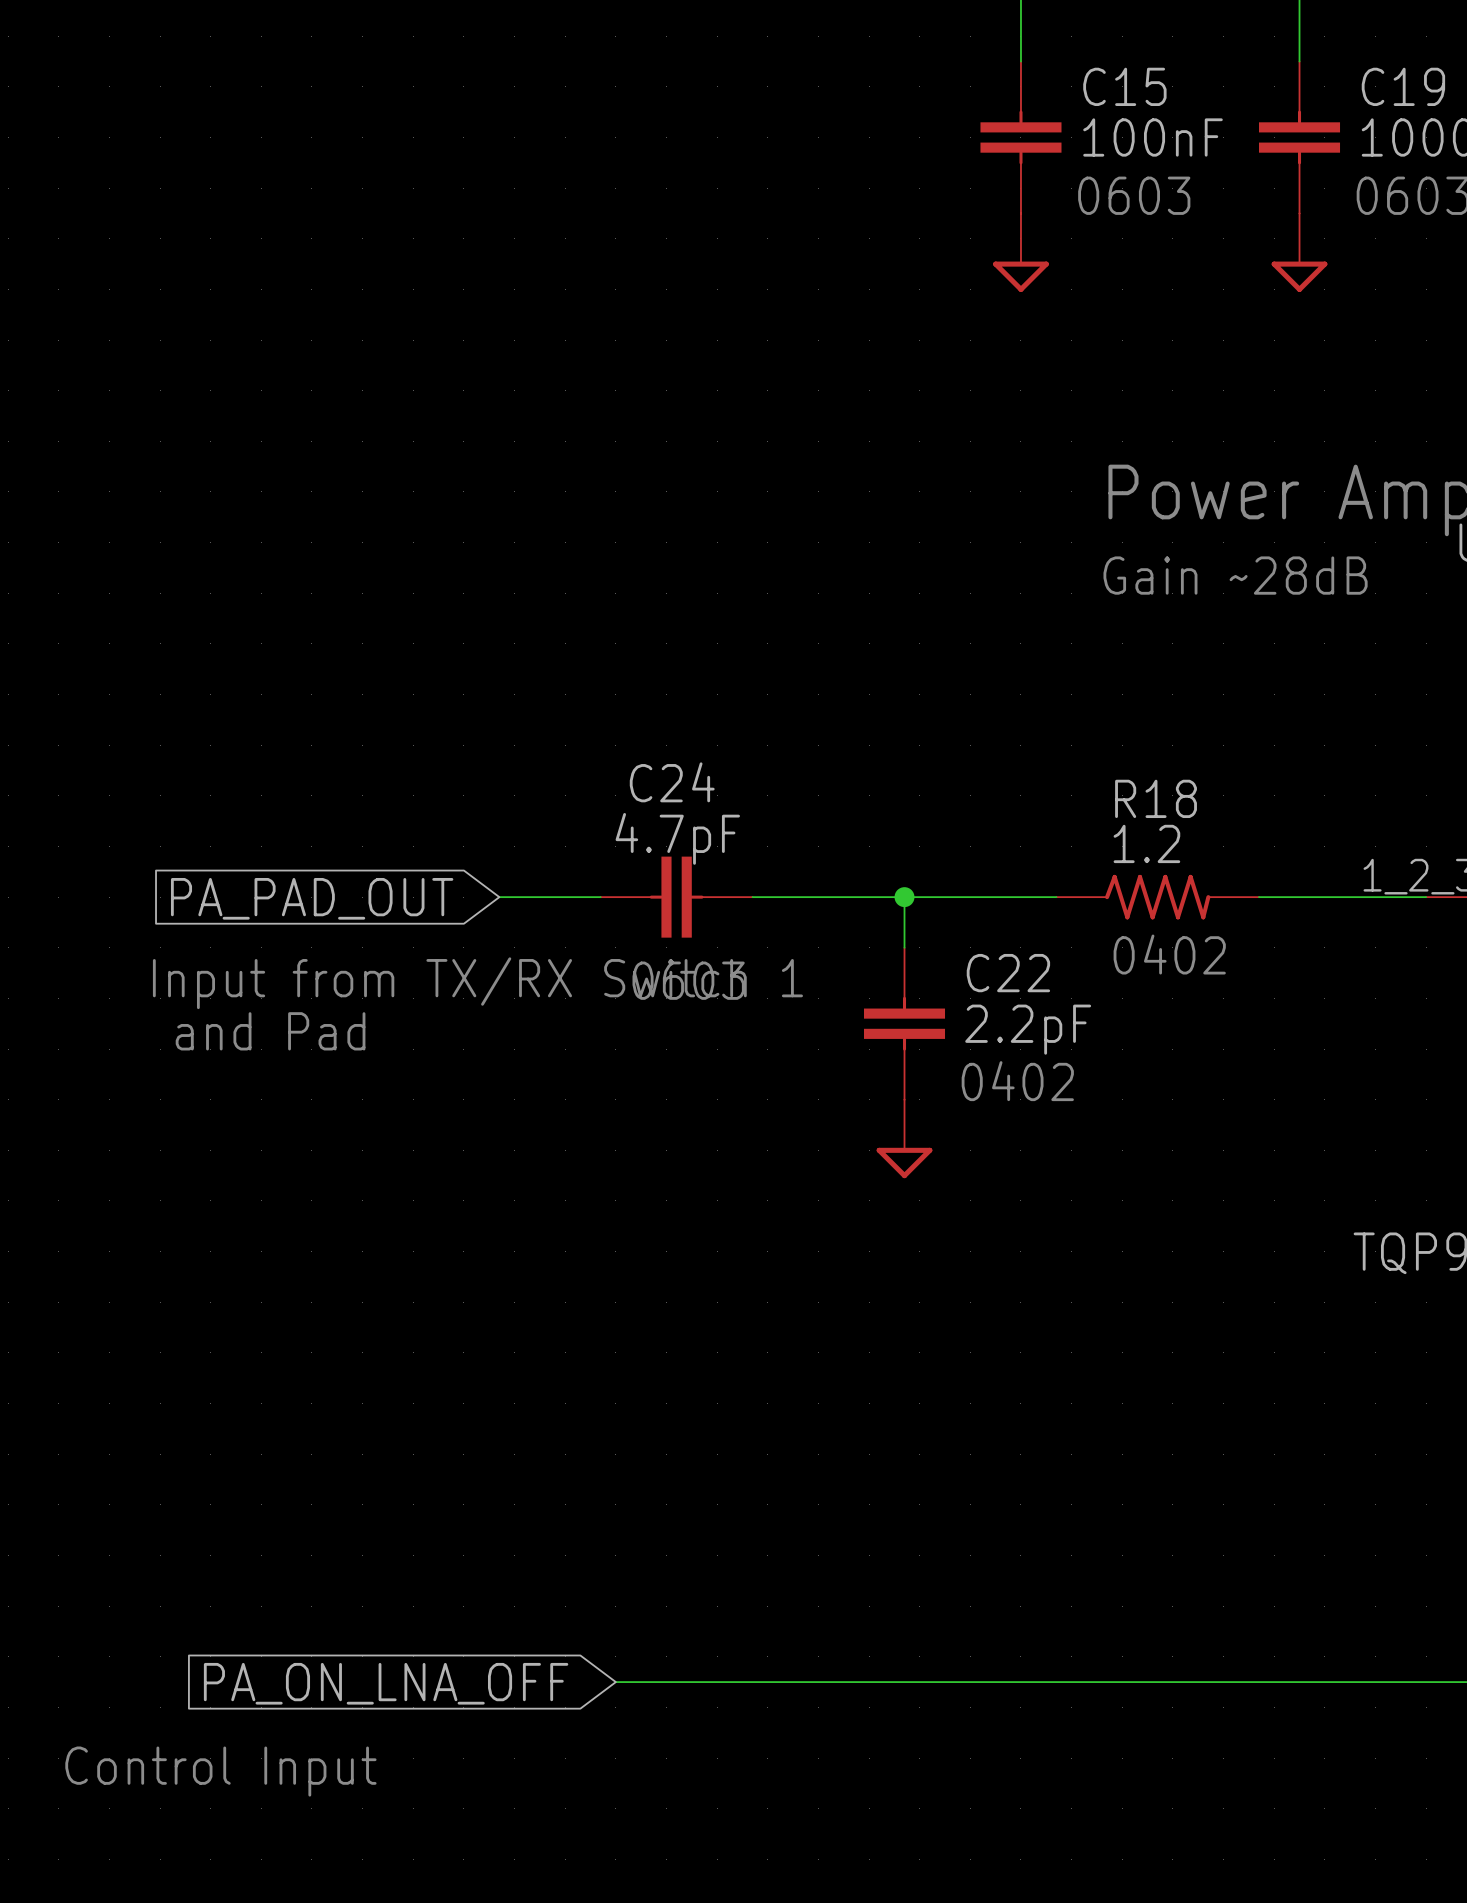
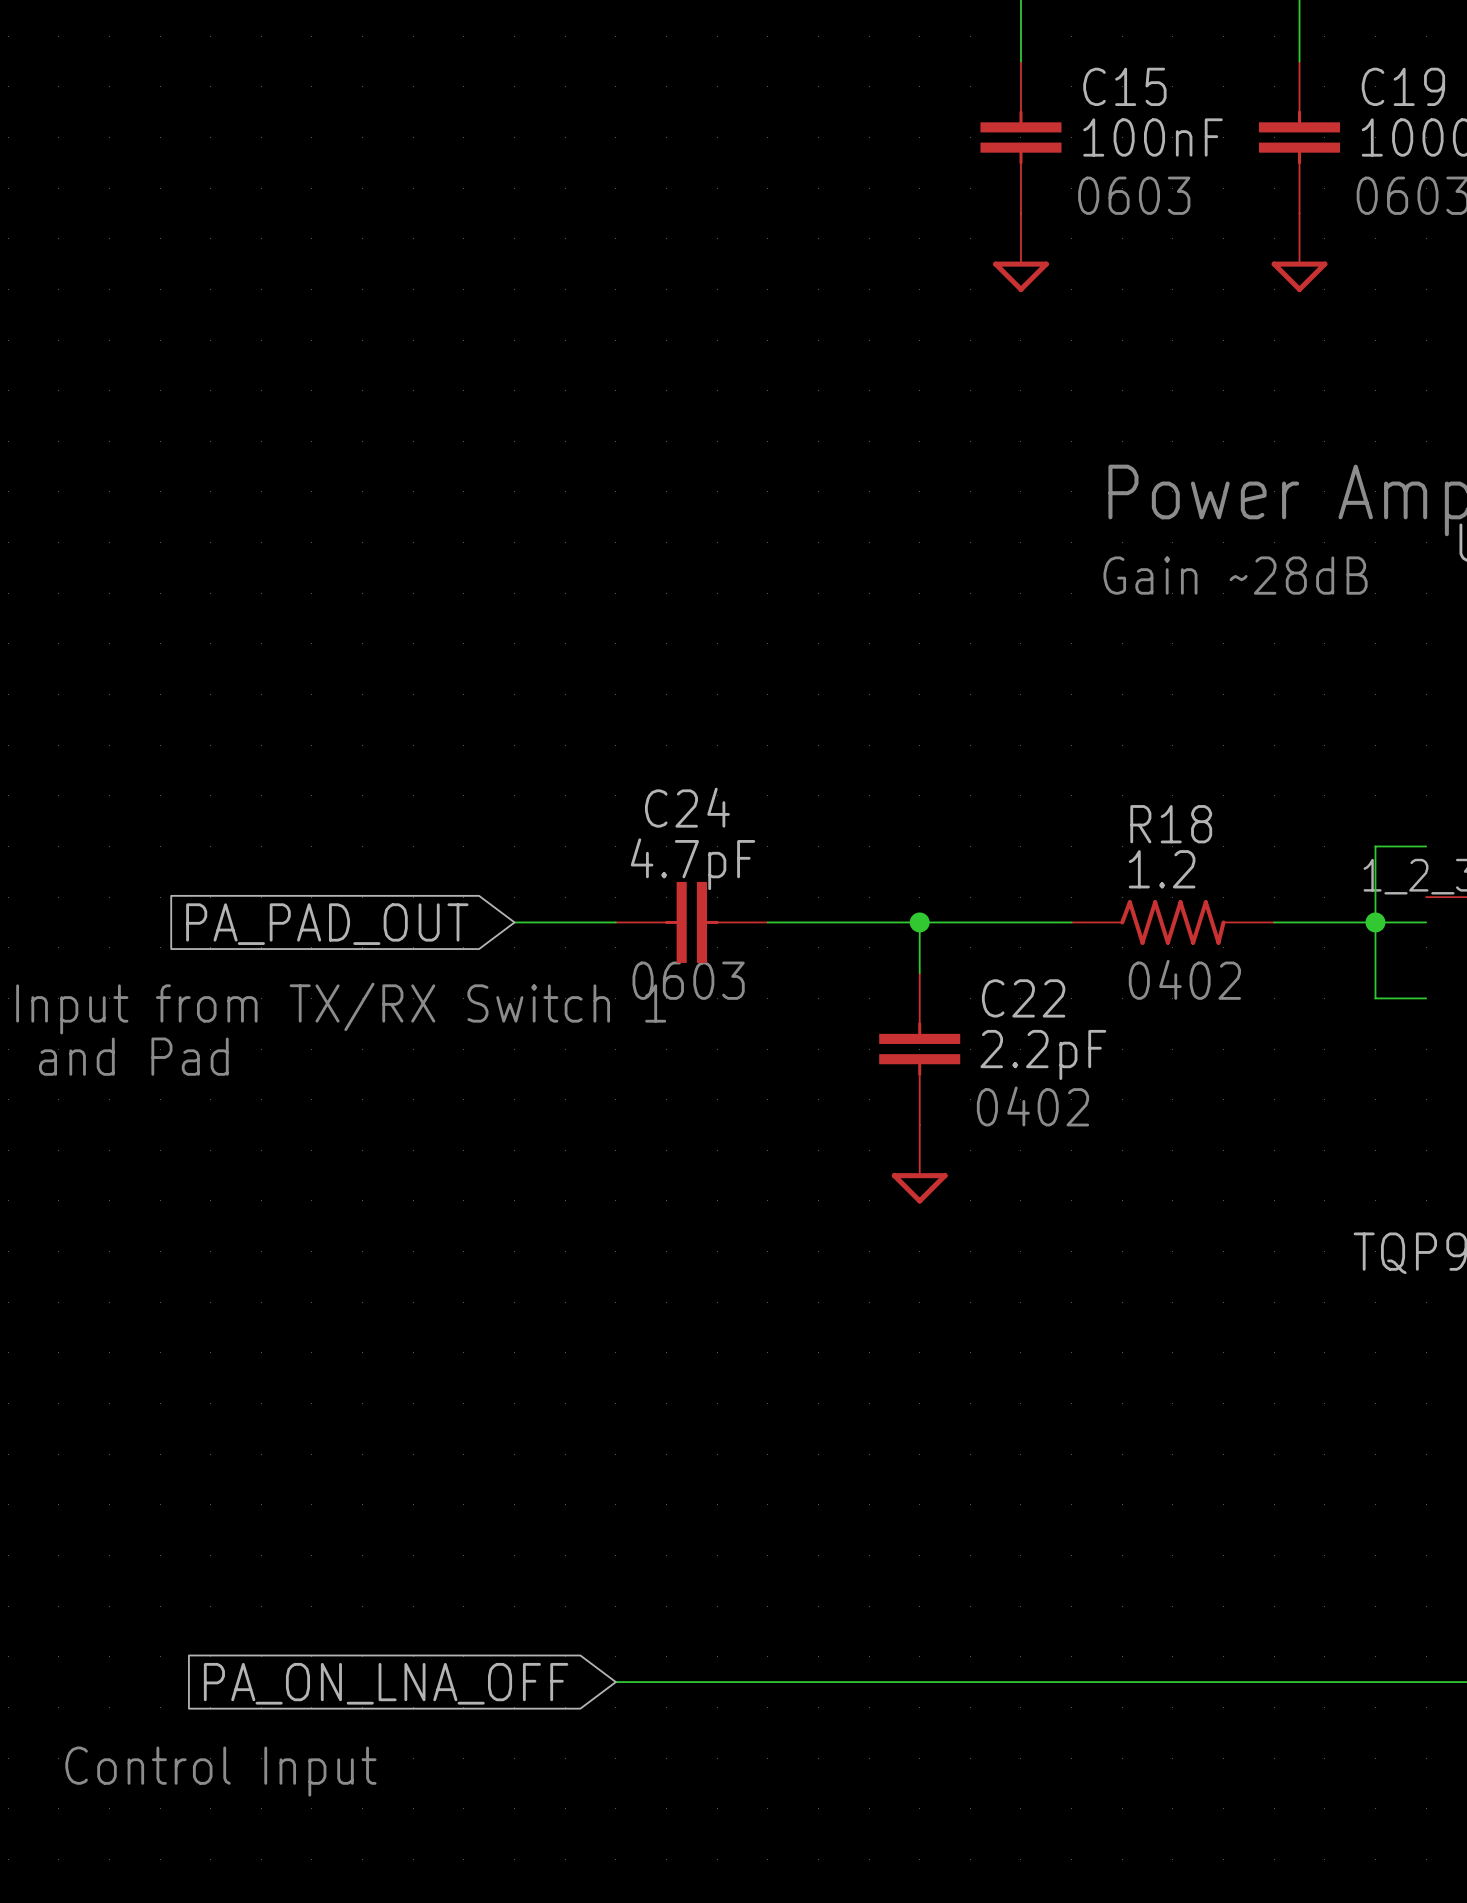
wire: none -> (1426, 846) (1375, 846) (1375, 998) (1426, 998)
wire: (499, 897) (600, 897) -> (514, 922) (615, 922)
C24 position: (676, 897) -> (691, 922)
wire: (752, 897) (1056, 897) -> (767, 922) (1071, 922)
wire: (904, 897) (904, 947) -> (919, 922) (919, 973)
junction position: (904, 897) -> (919, 922)
R18 position: (1157, 897) -> (1172, 922)
wire: (1259, 897) (1426, 897) -> none
global label position: PA_PAD_OUT (312, 898) -> PA_PAD_OUT (327, 924)
wire: none -> (1274, 922) (1426, 922)
junction: none -> (1375, 922)
text position: 0402 (1169, 954) -> 0402 (1184, 979)
text position: Input from TX/RX Switch 1 (477, 983) -> Input from TX/RX Switch 1 (341, 1008)
C22 position: (904, 1023) -> (919, 1049)
text position: and Pad (270, 1031) -> and Pad (133, 1056)
text position: 0402 (1017, 1081) -> 0402 (1032, 1106)
power symbol position: (904, 1138) -> (919, 1164)

